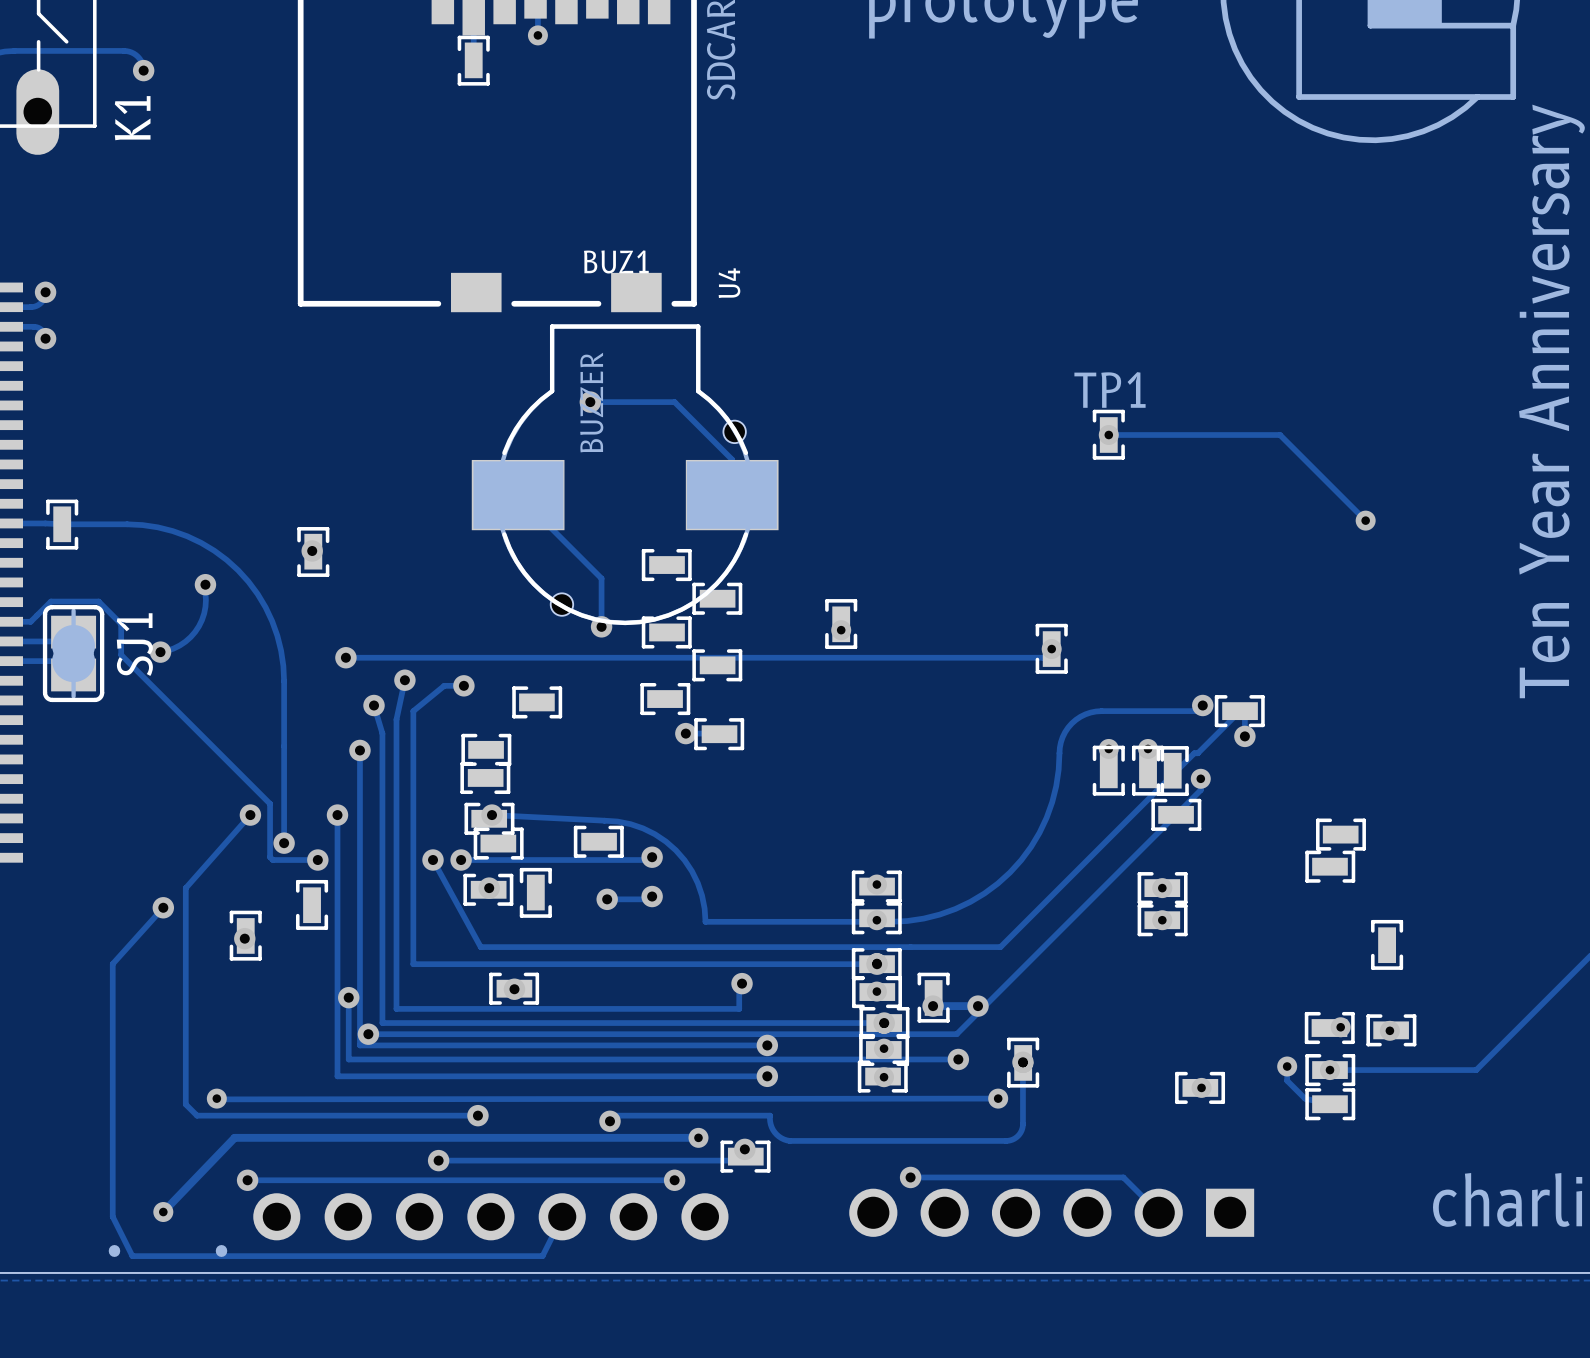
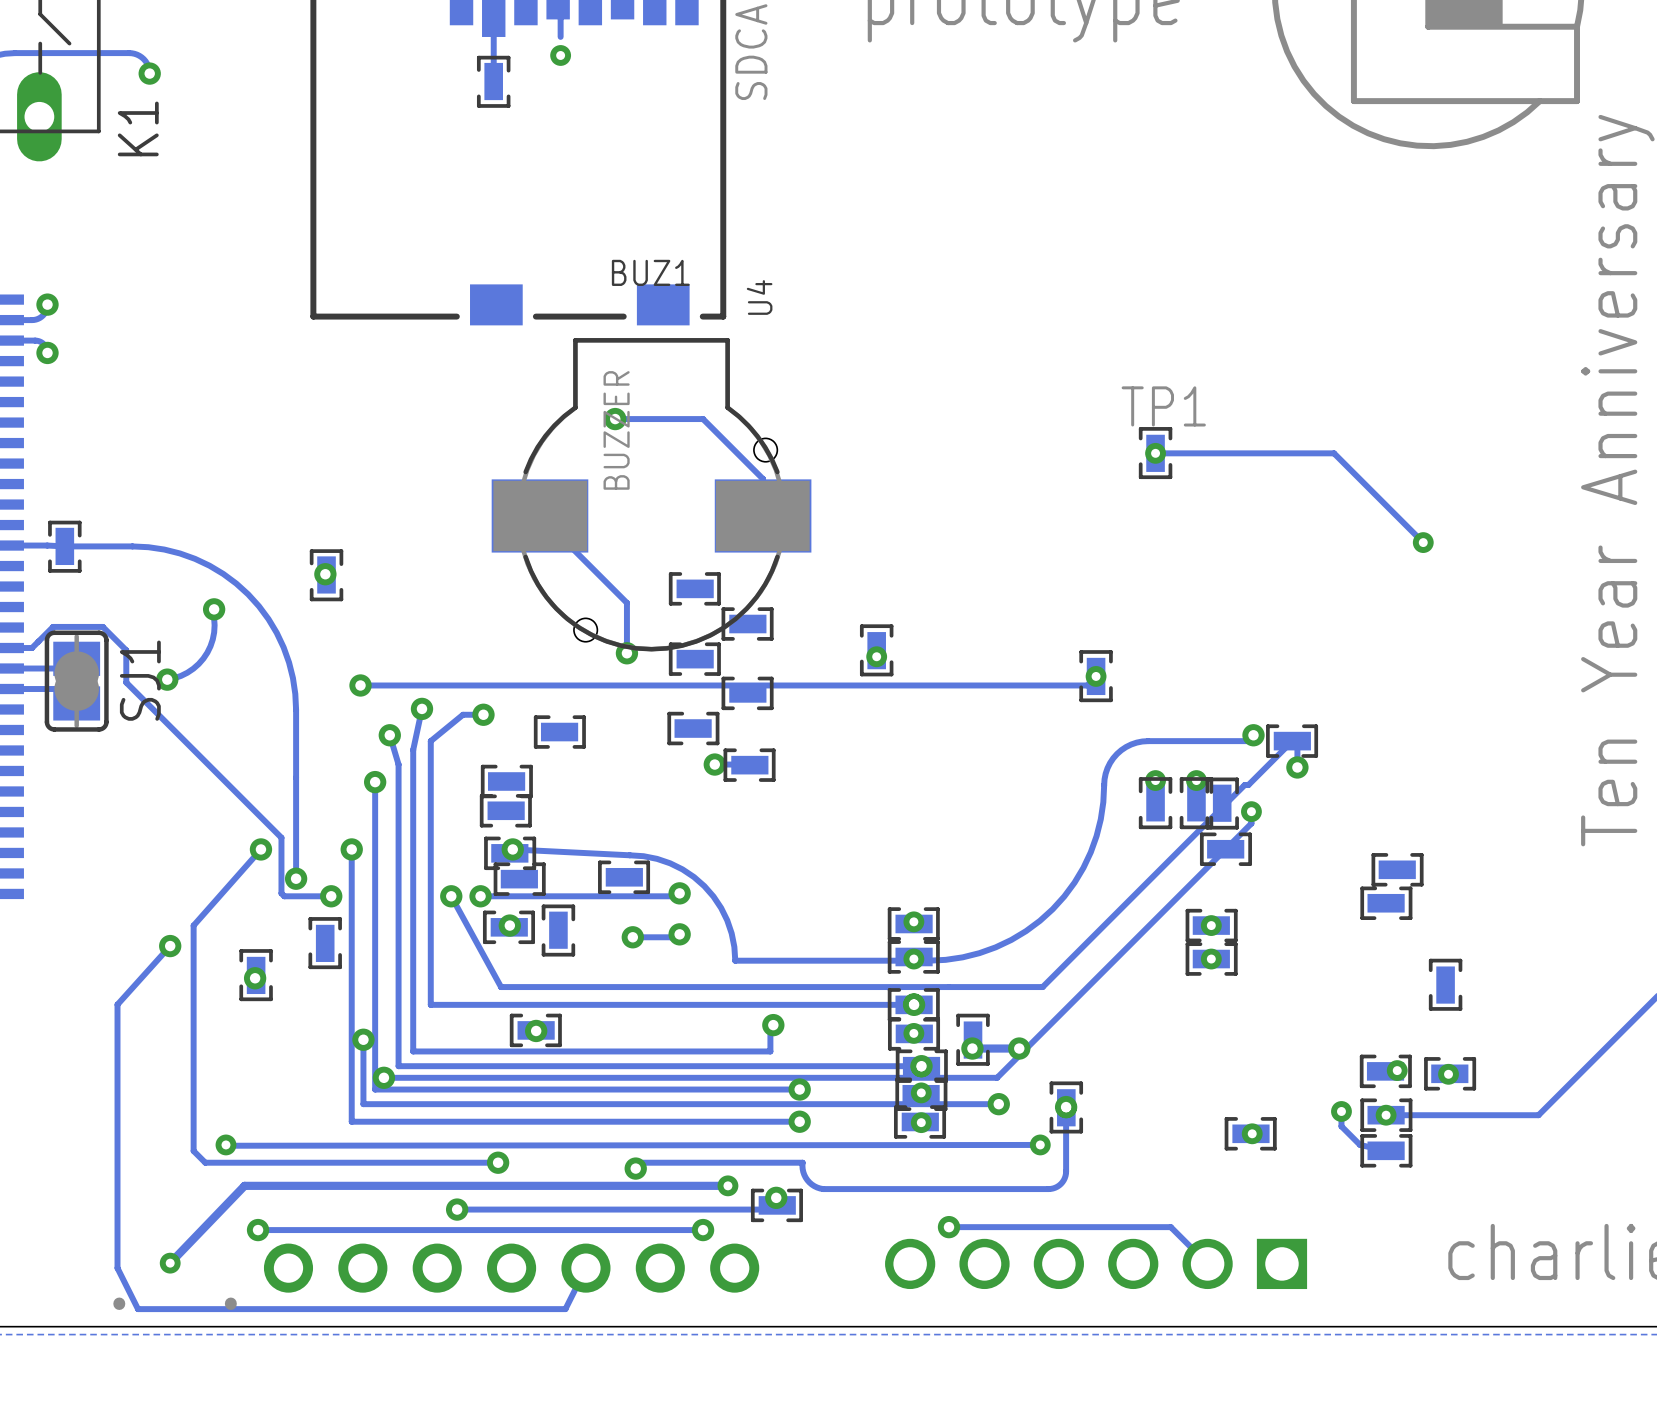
via position: (537, 35) -> (560, 55)
part position: (473, 60) -> (493, 81)

